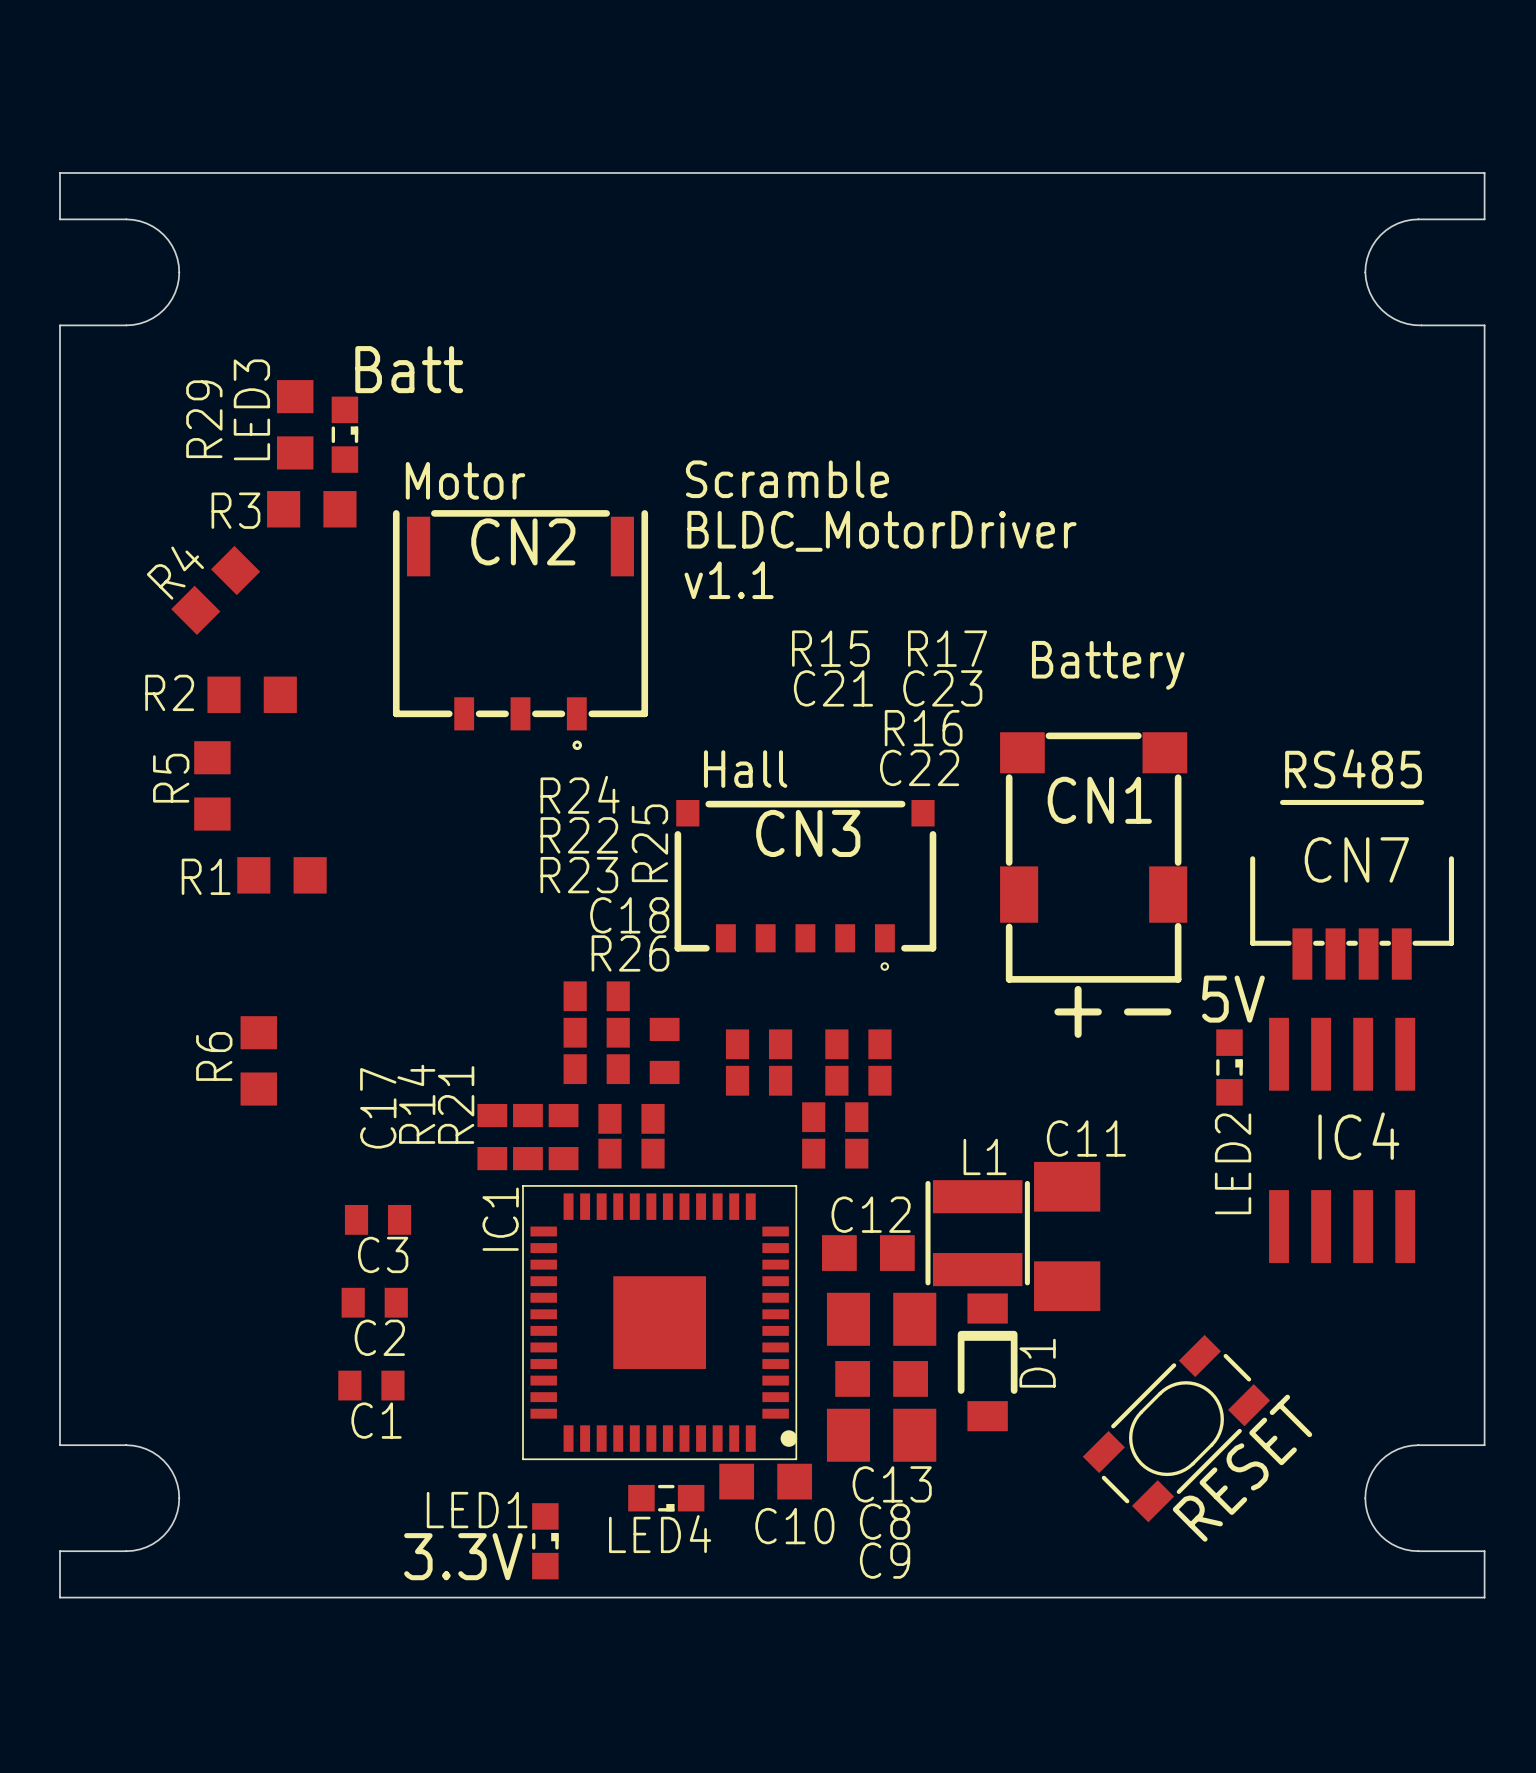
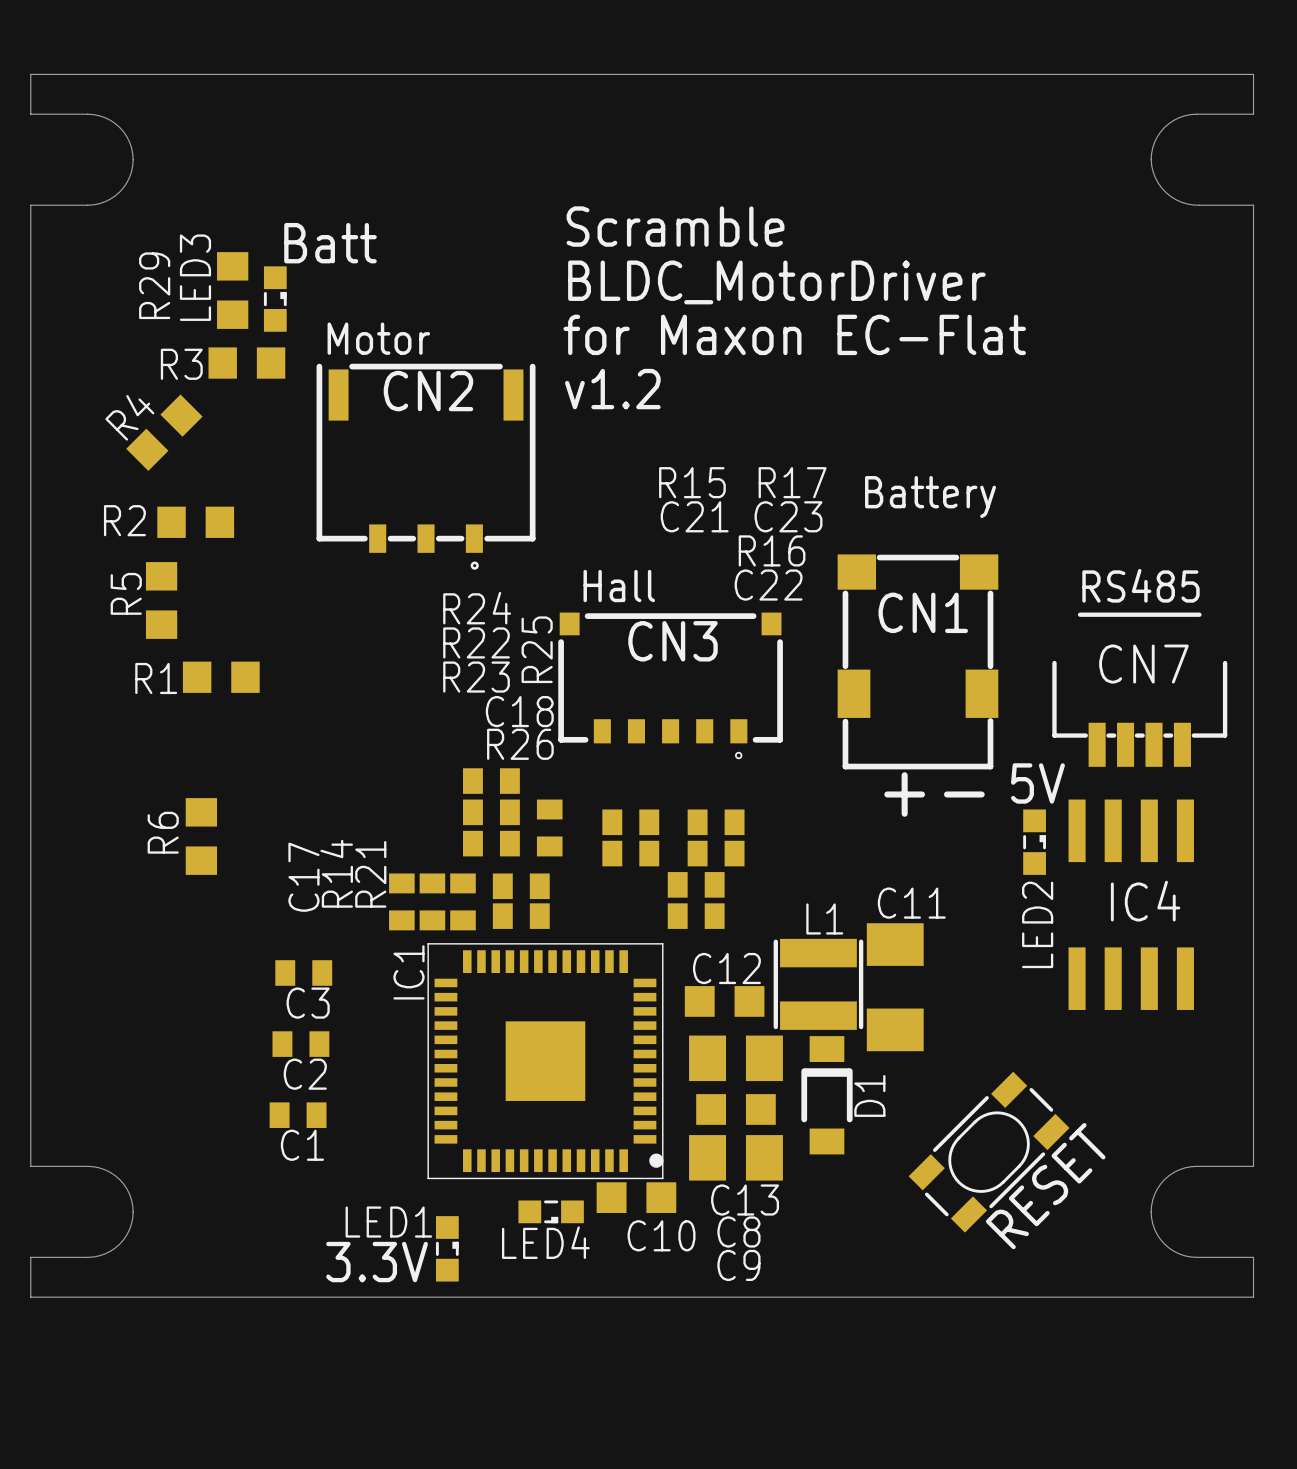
text: none -> Scramble (675, 226)
text: none -> BLDC_MotorDriver (776, 282)
text: Scramble (787, 479) -> for Maxon EC-Flat (794, 334)
text: BLDC_MotorDriver (881, 531) -> v1.2 (612, 389)
text: v1.1 (729, 580) -> none

